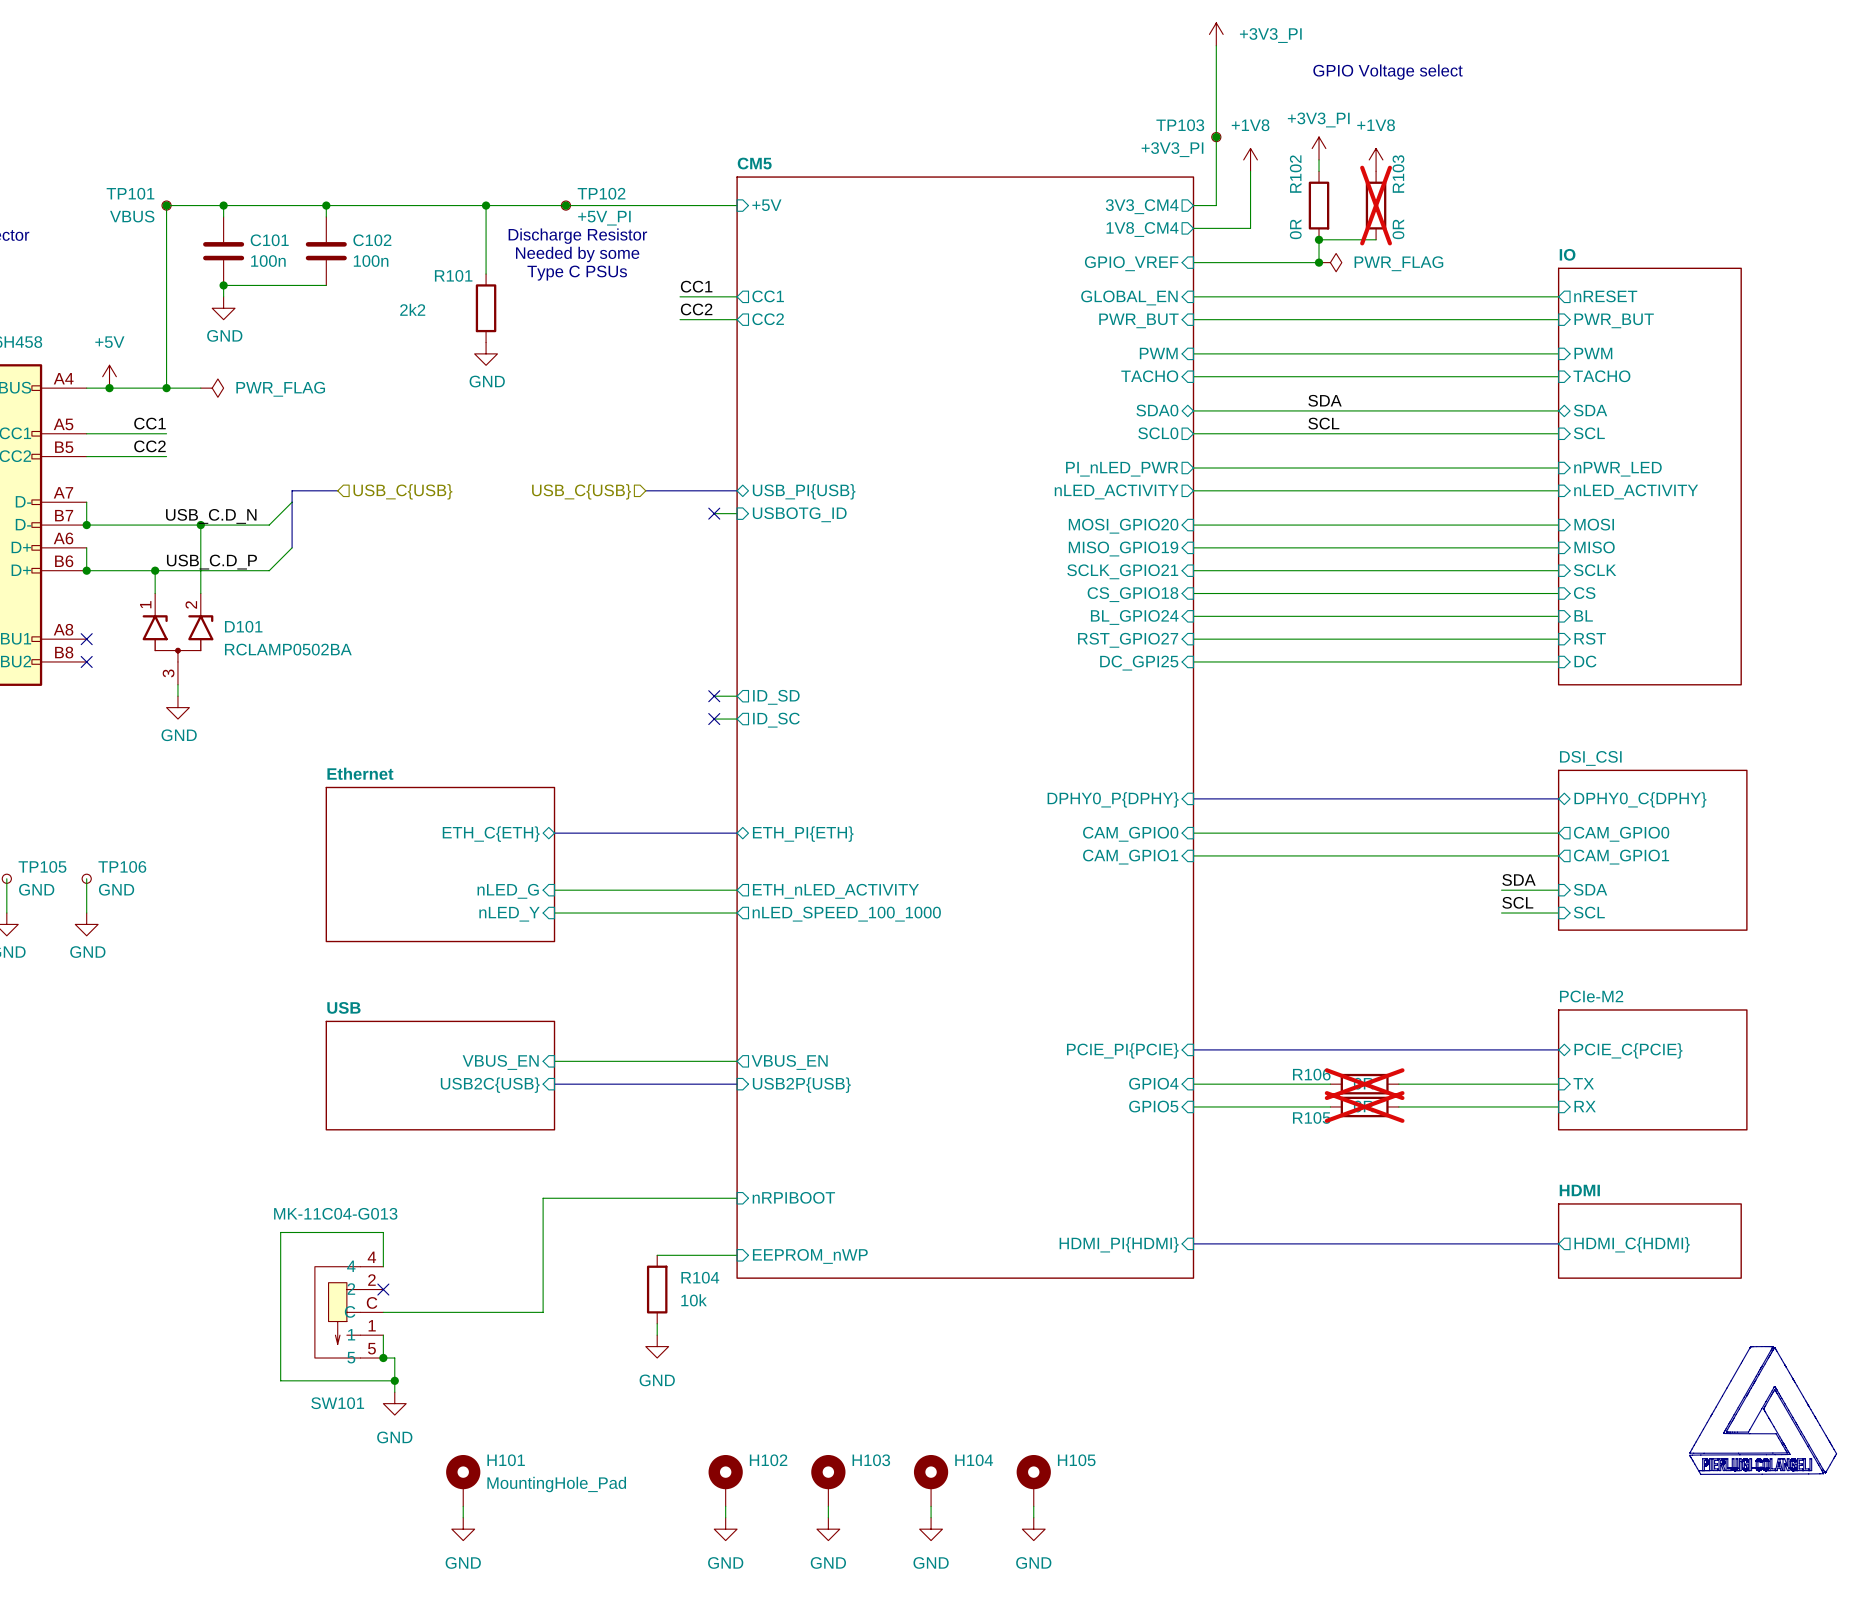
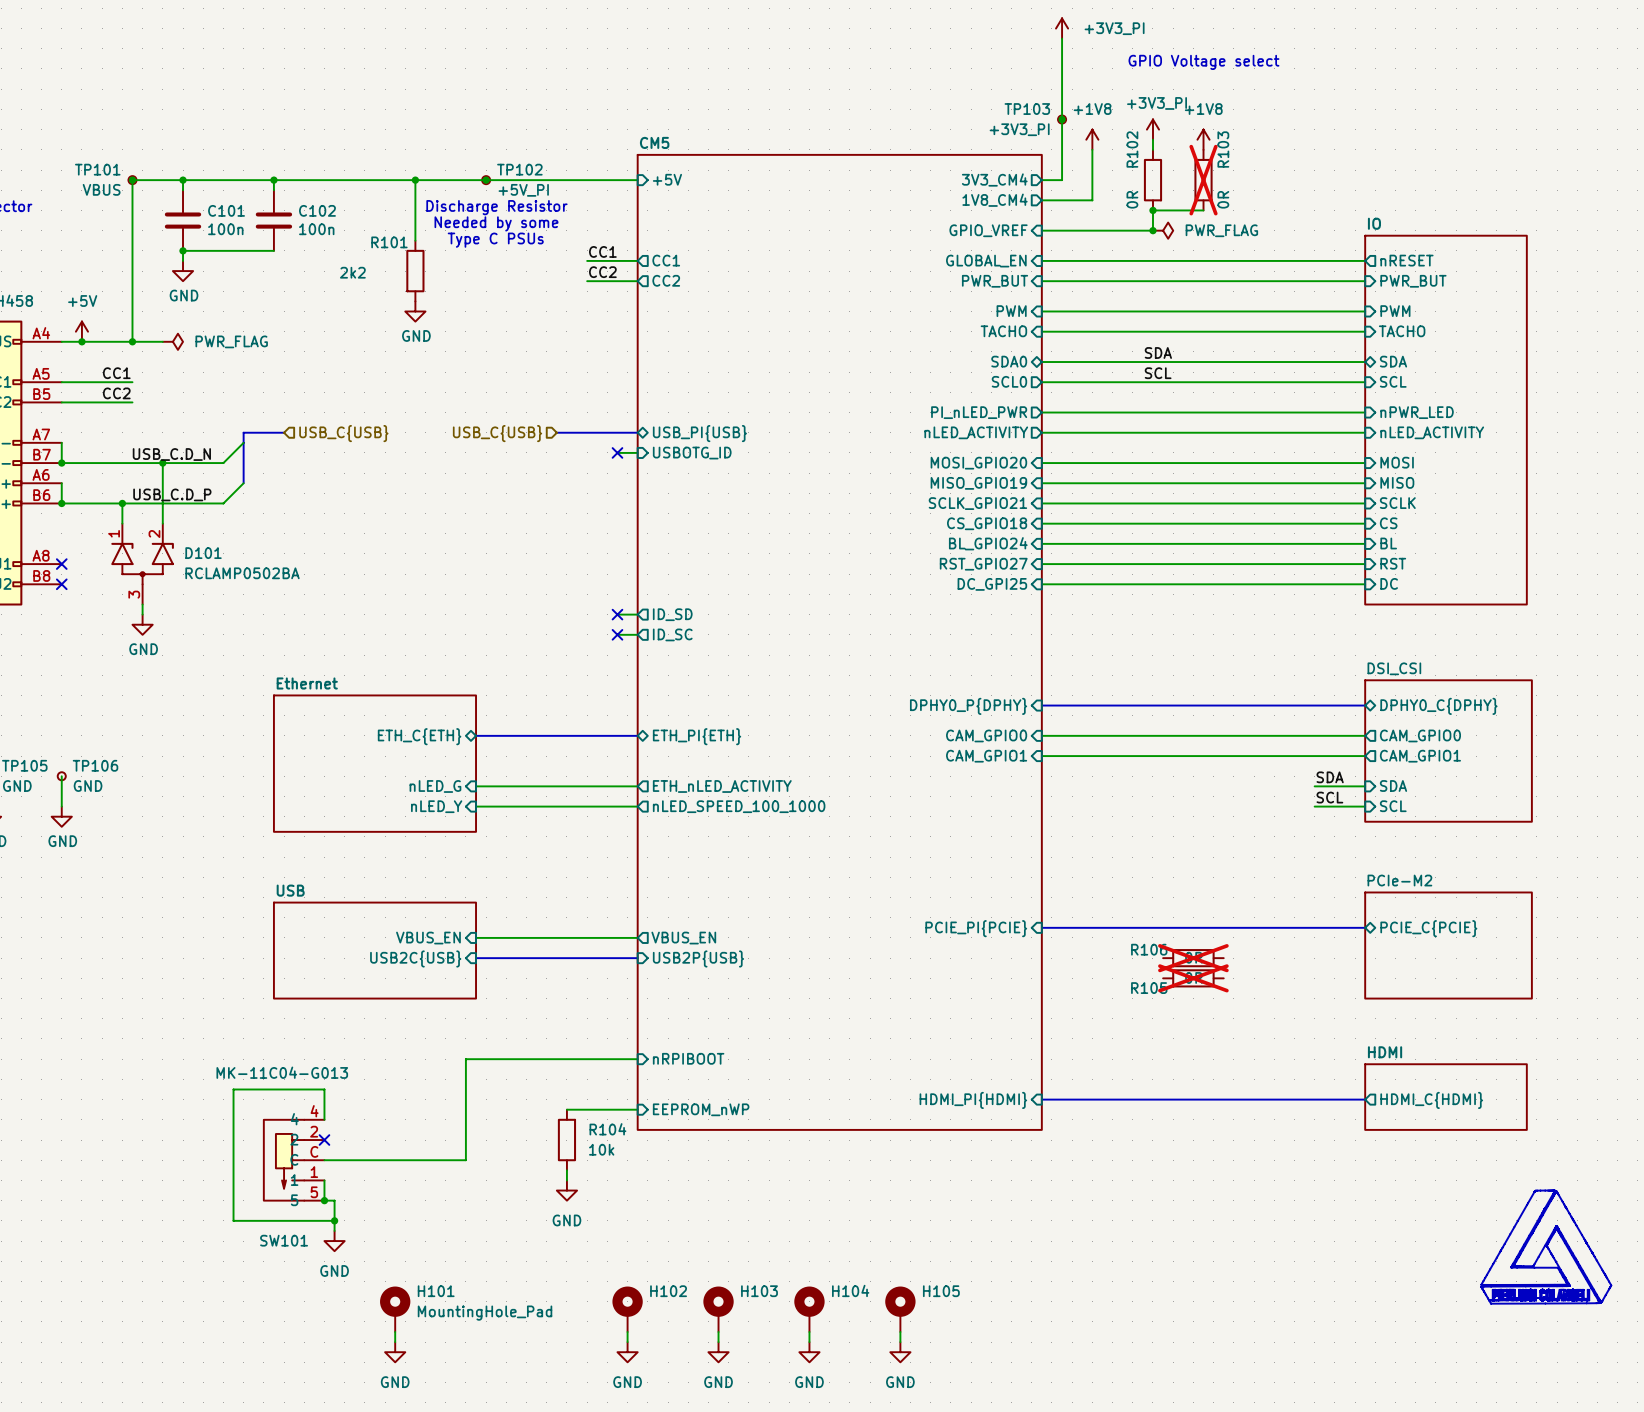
sheet pin: GPIO4 (1153, 1083) -> none
sheet pin: TX (1583, 1083) -> none
wire: (1193, 1084) (1330, 1084) -> none
wire: (1398, 1084) (1558, 1084) -> none
sheet pin: GPIO5 (1153, 1106) -> none
wire: (1193, 1106) (1330, 1106) -> none
wire: (1398, 1106) (1558, 1106) -> none
sheet pin: RX (1585, 1106) -> none

